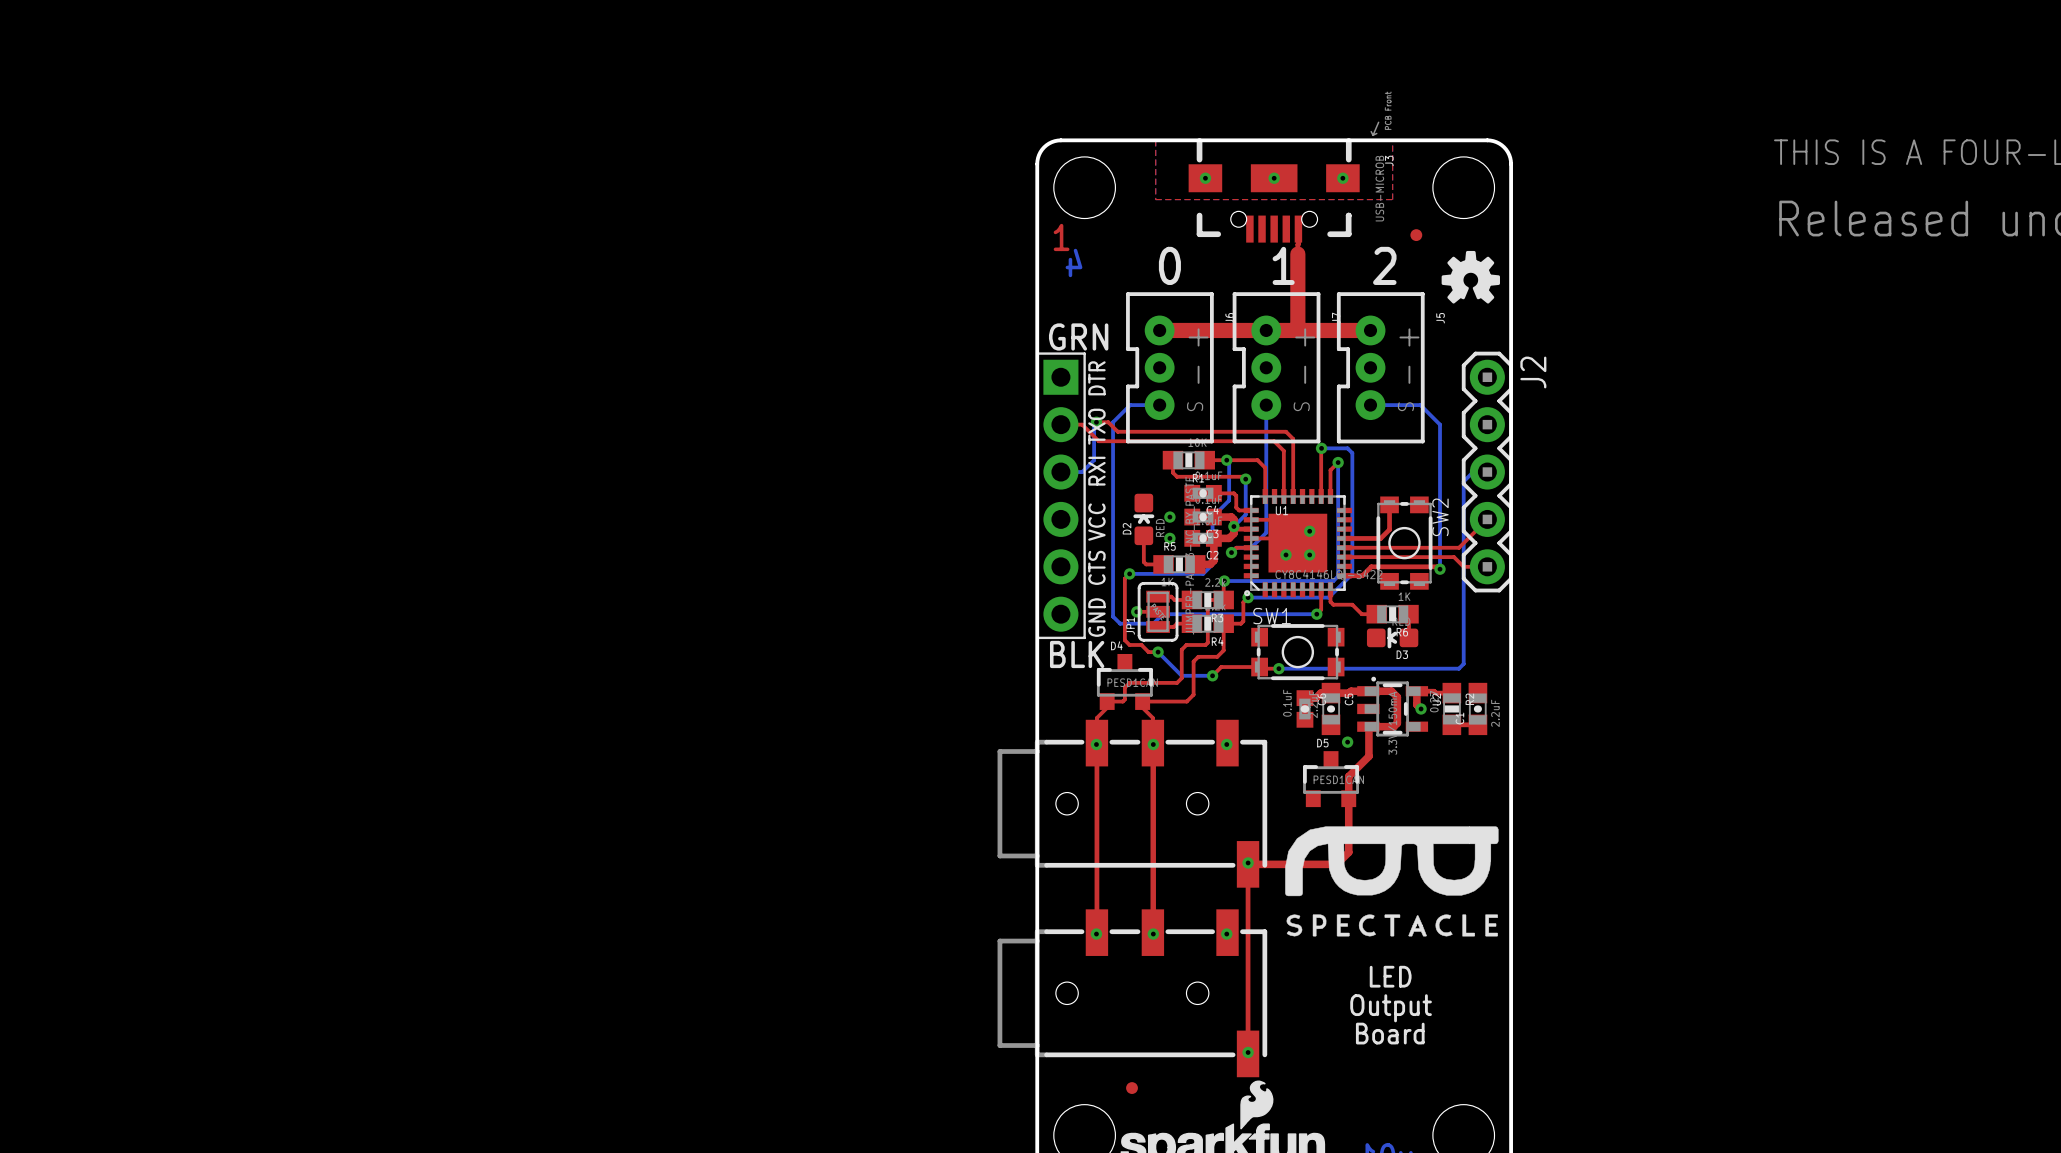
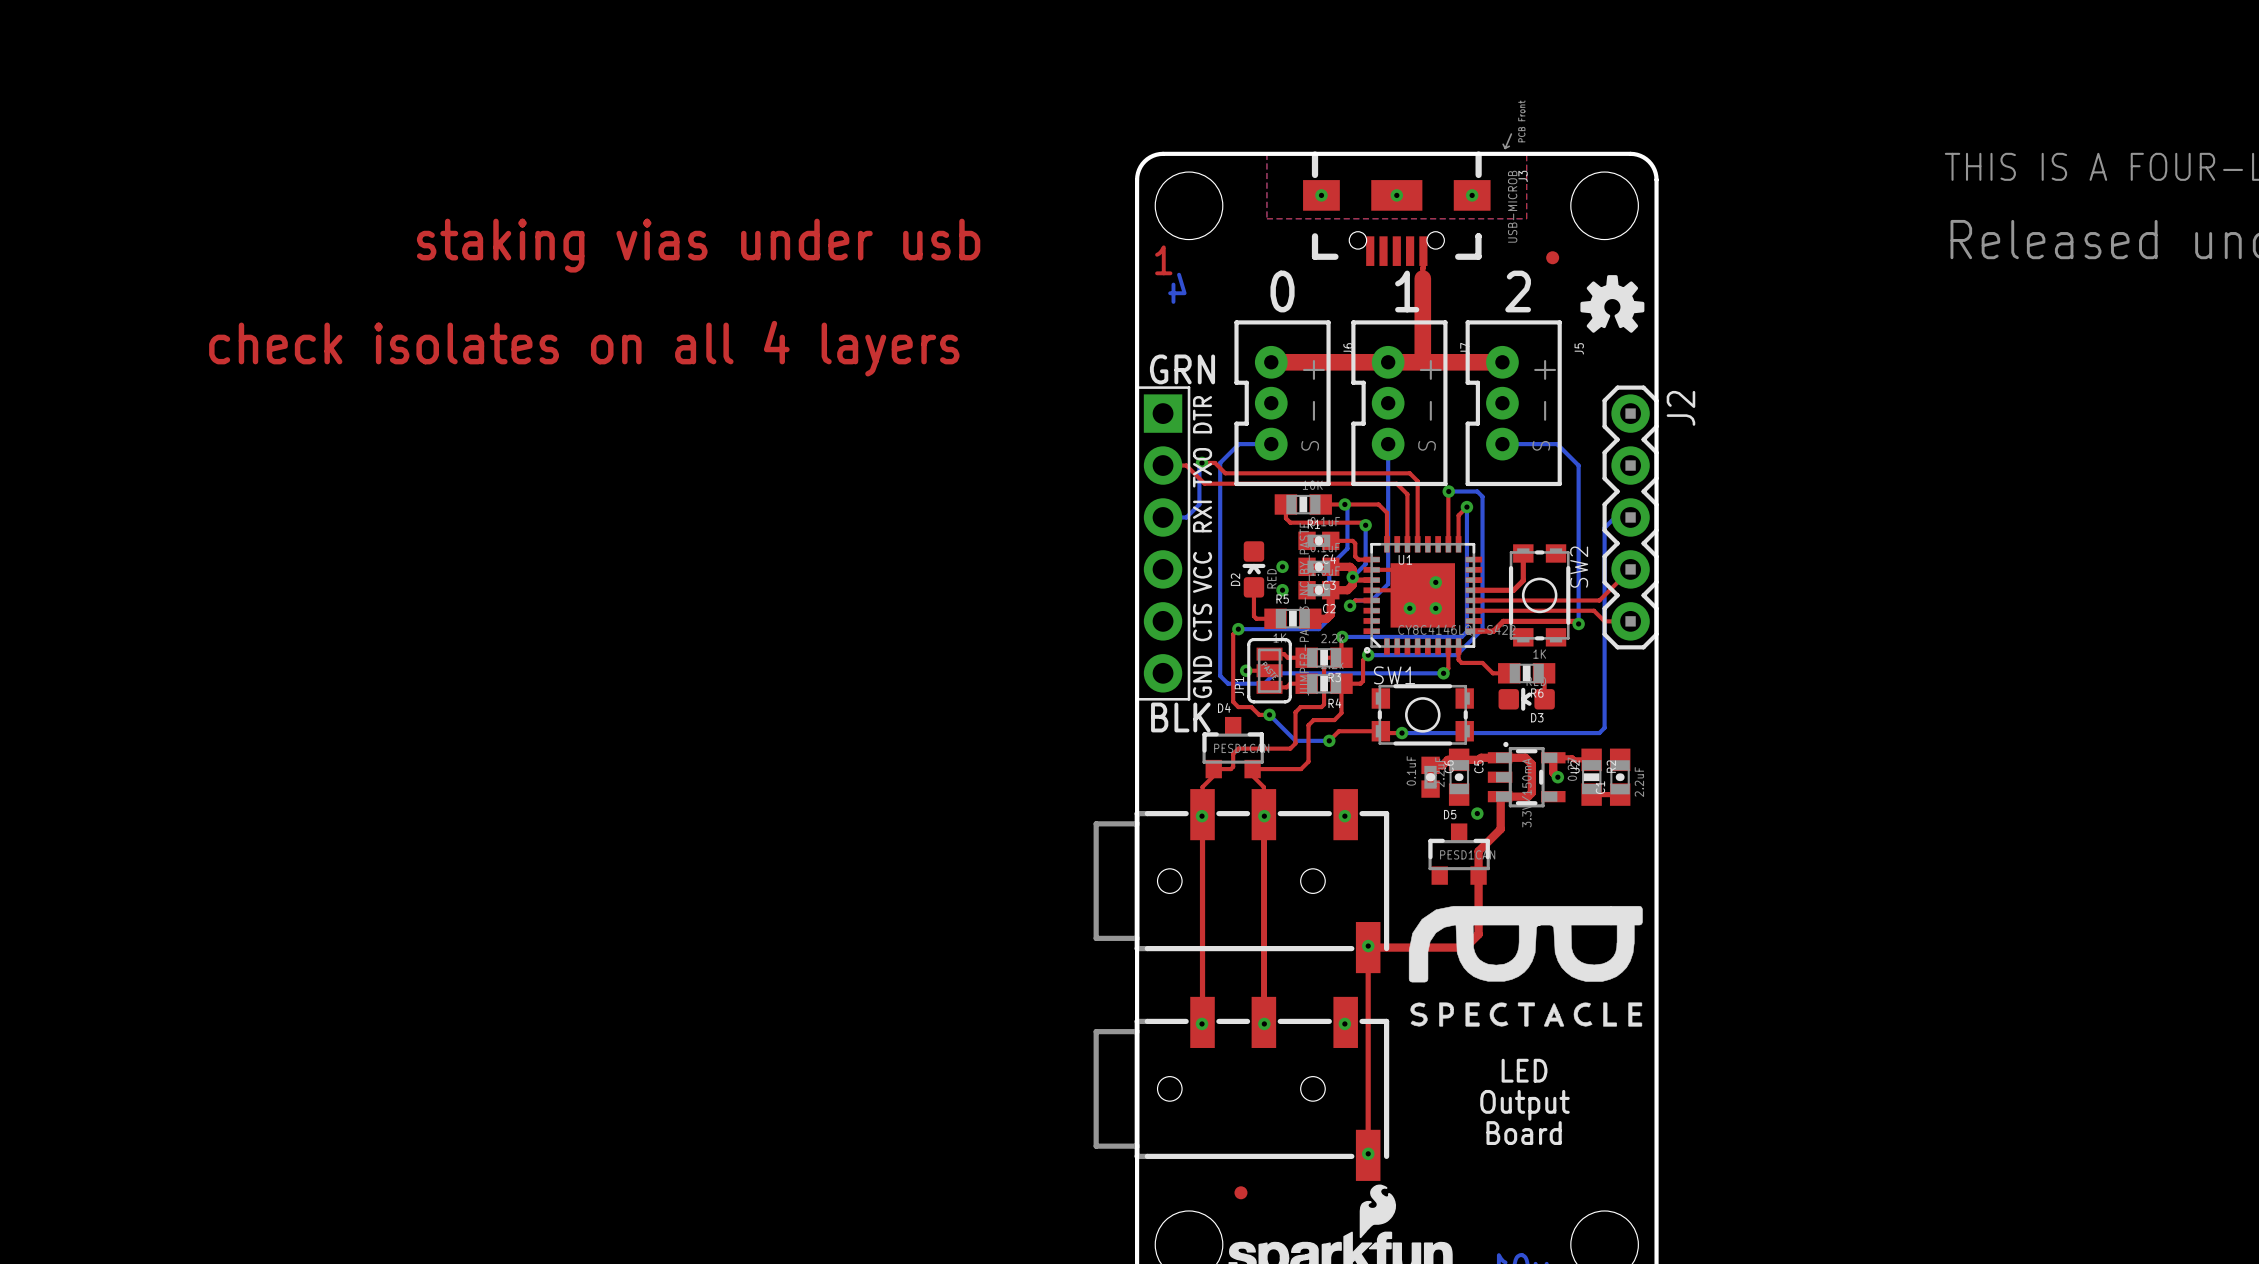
text: none -> staking vias under usb (698, 245)
text: none -> check isolates on all 4 layers (584, 348)

